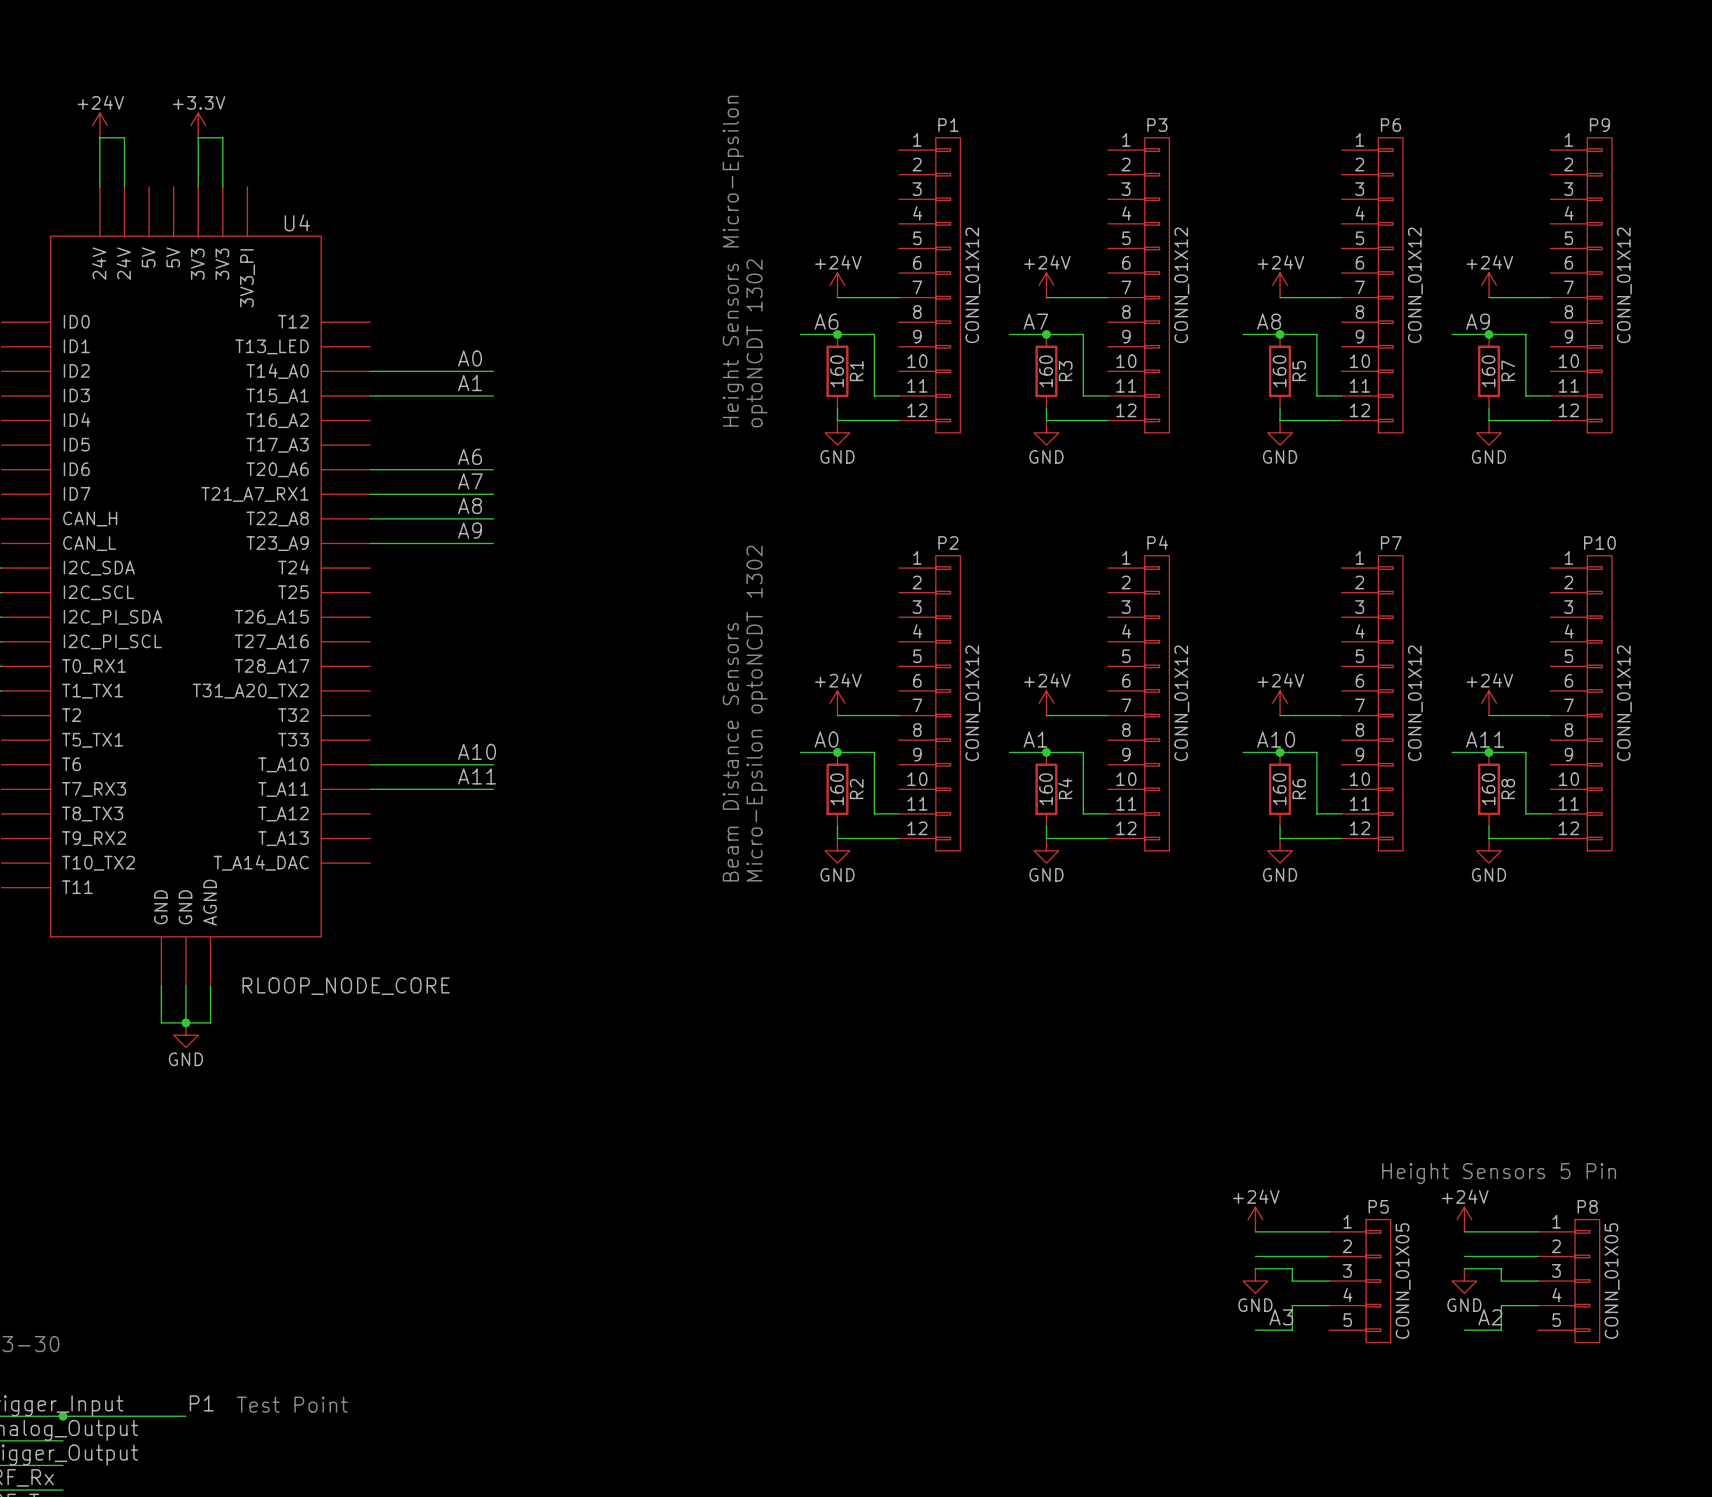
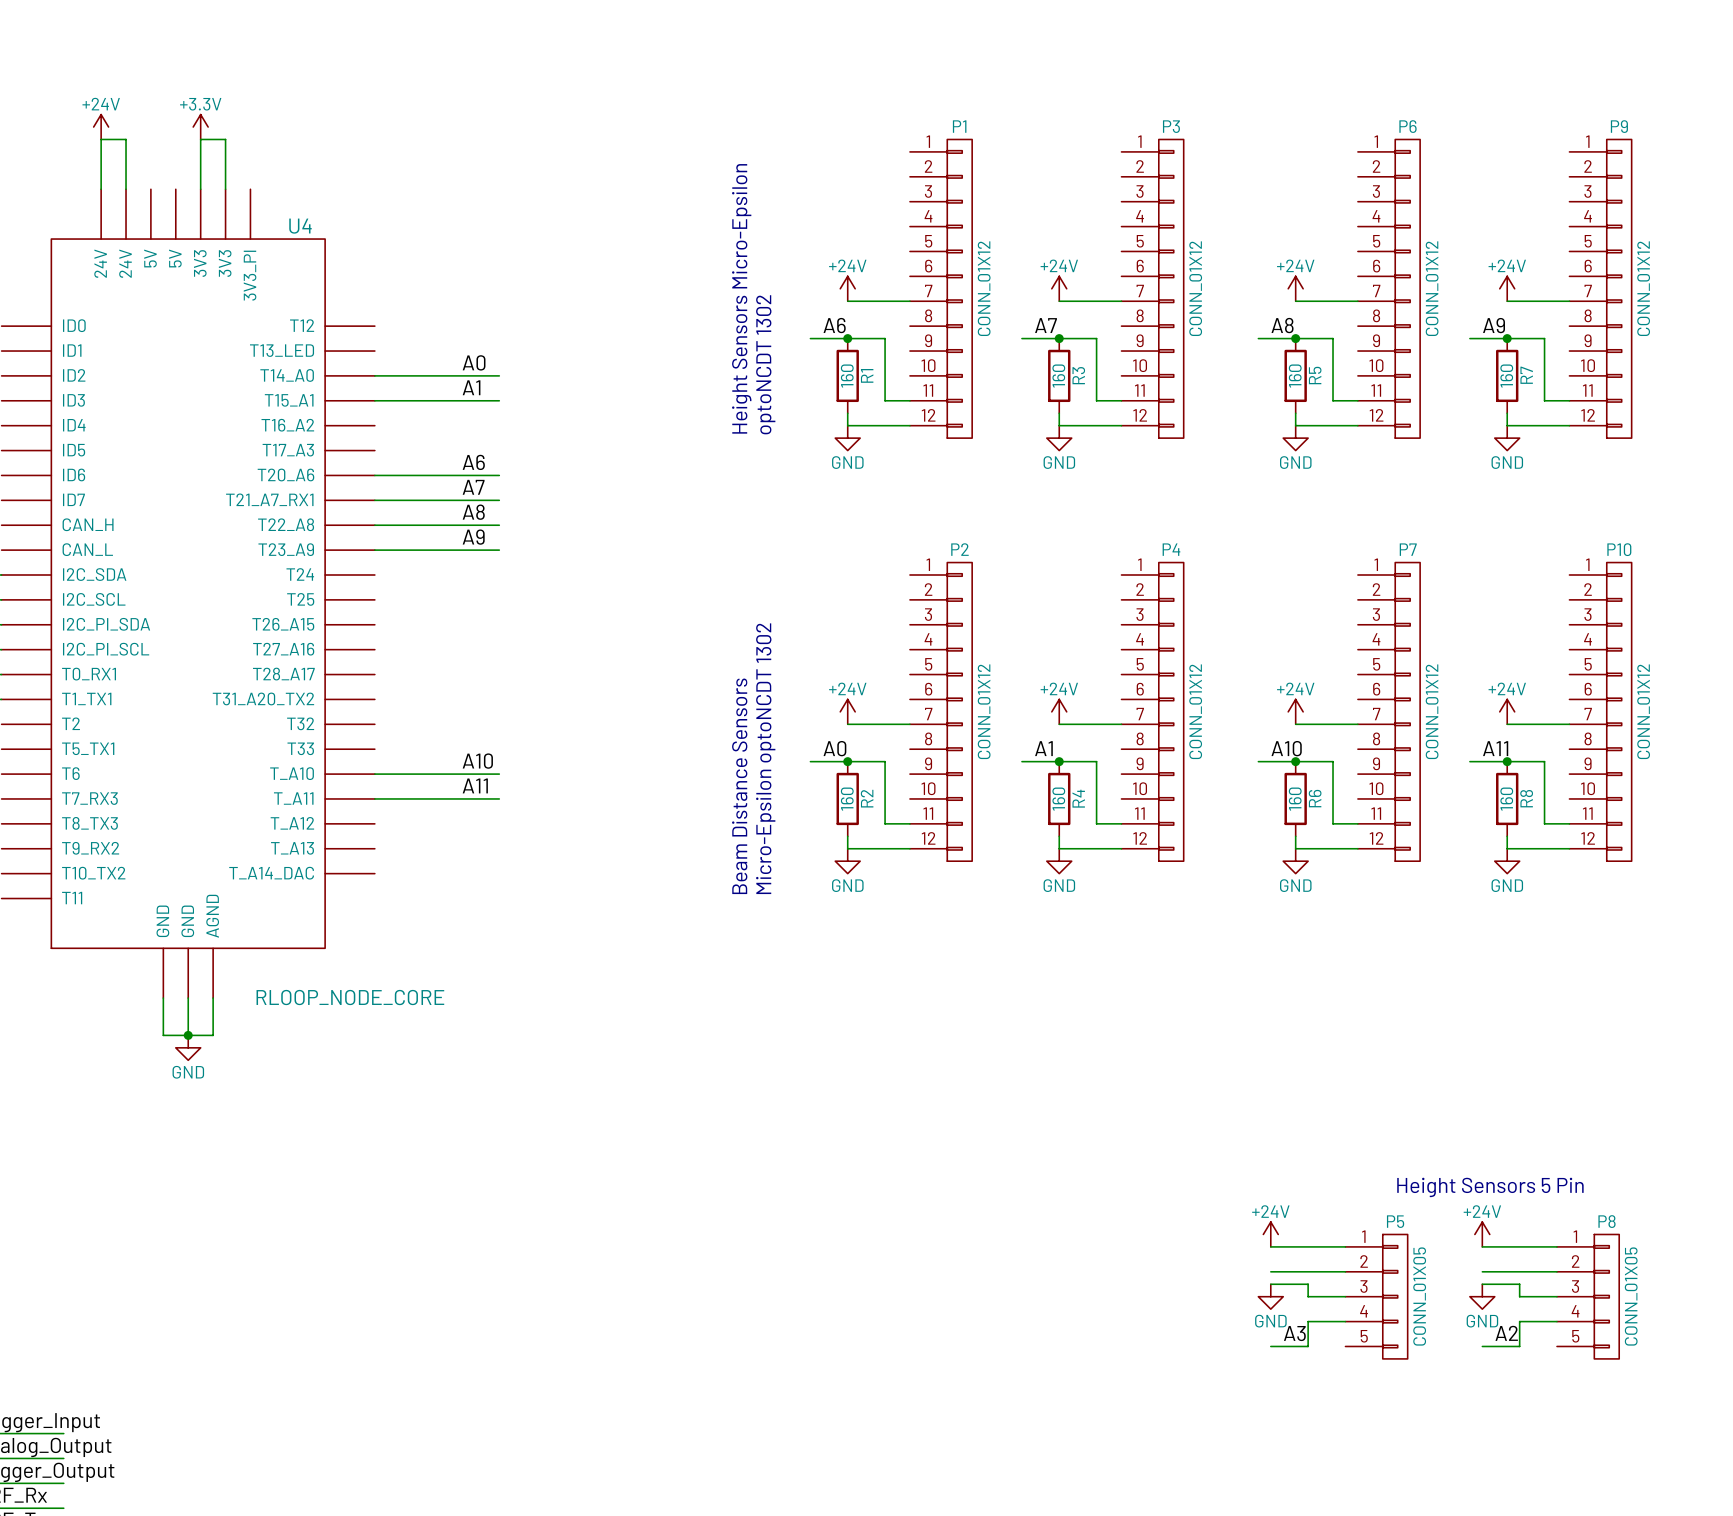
label: P1 (201, 1403) -> none
text: Test Point (292, 1404) -> none
wire: (63, 1416) (185, 1416) -> none
junction: (63, 1416) -> none

